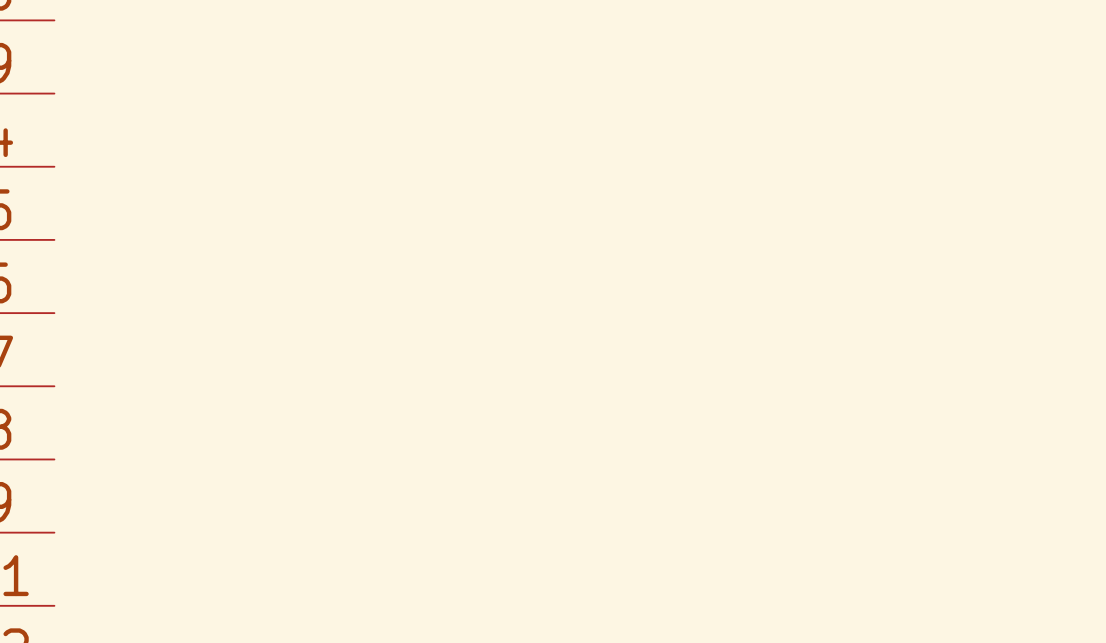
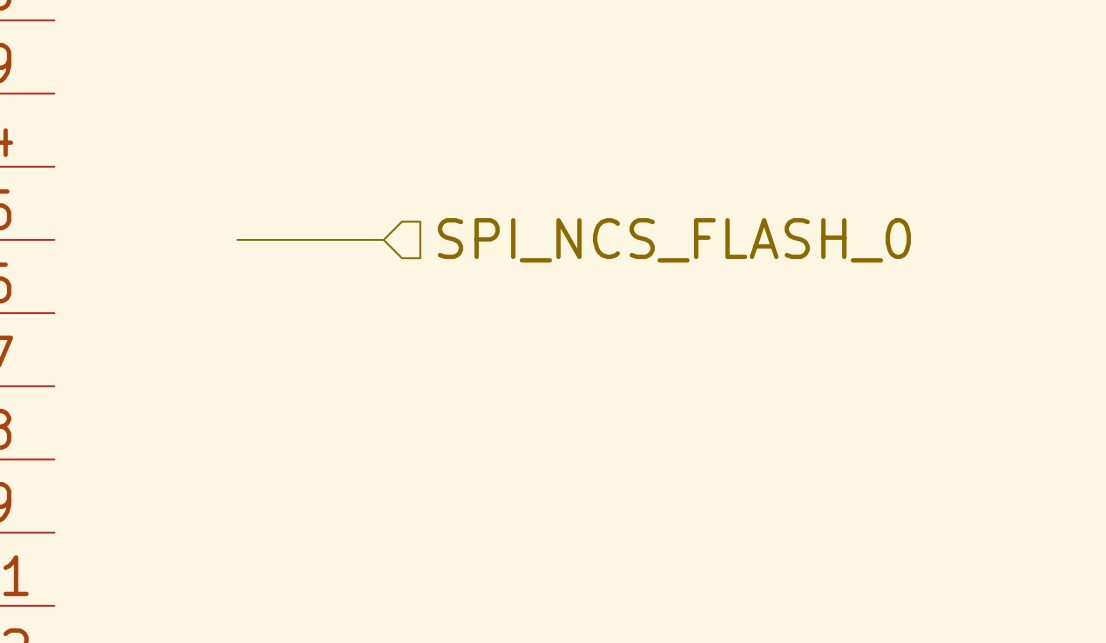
wire: none -> (237, 239) (383, 239)
hierarchical label: none -> SPI_NCS_FLASH_0 (674, 240)

